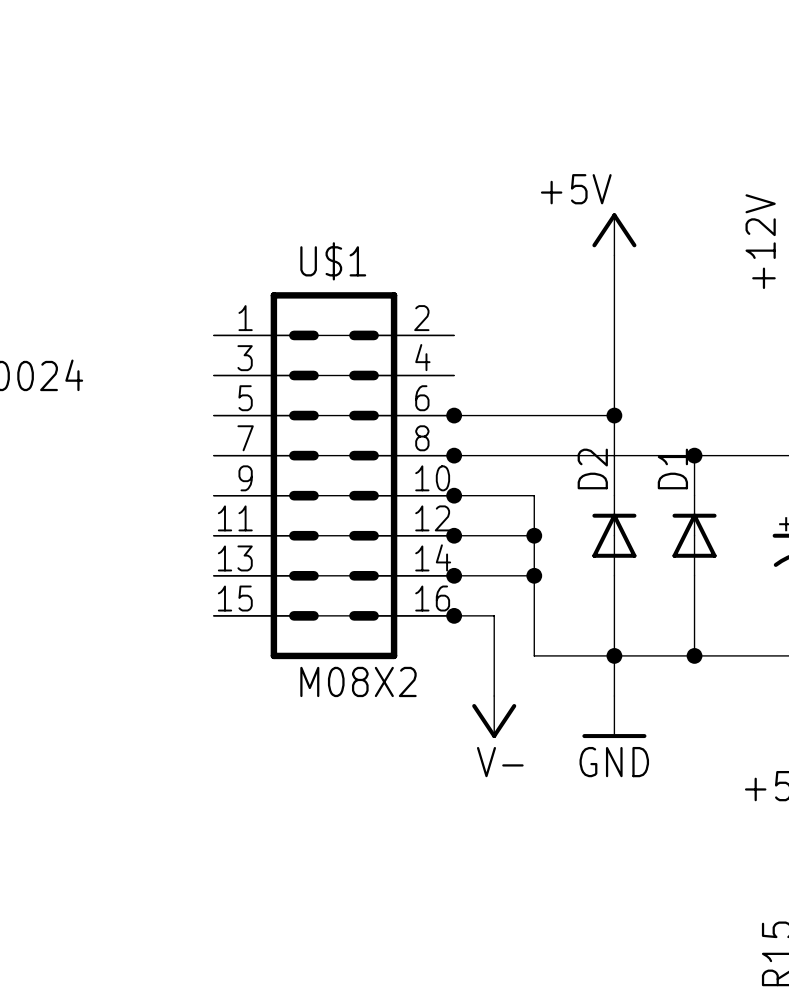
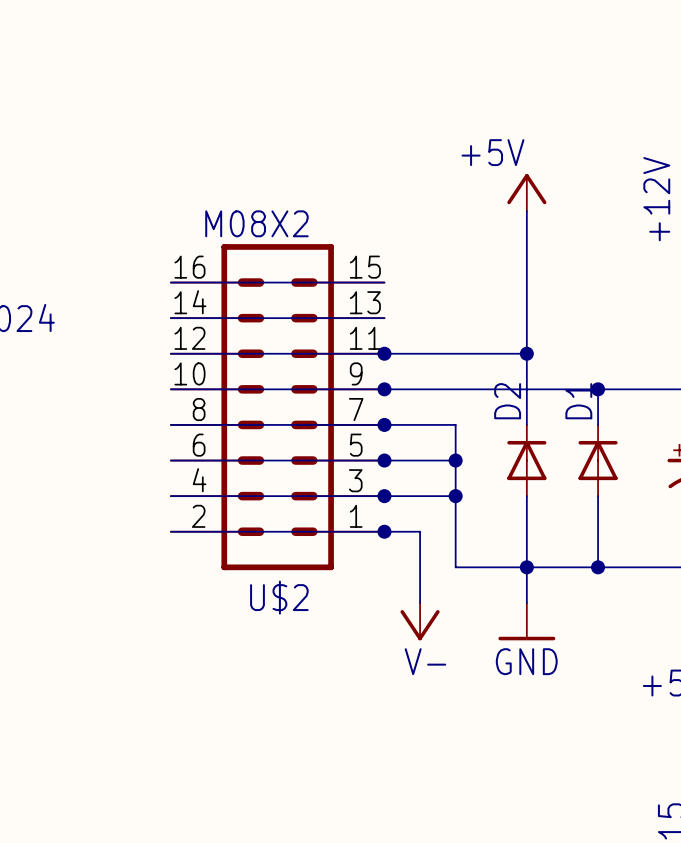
U$1 name: U$1 (333, 261) -> U$2 (279, 597)
U$1 rotation: 0° (333, 475) -> 180° (277, 407)

